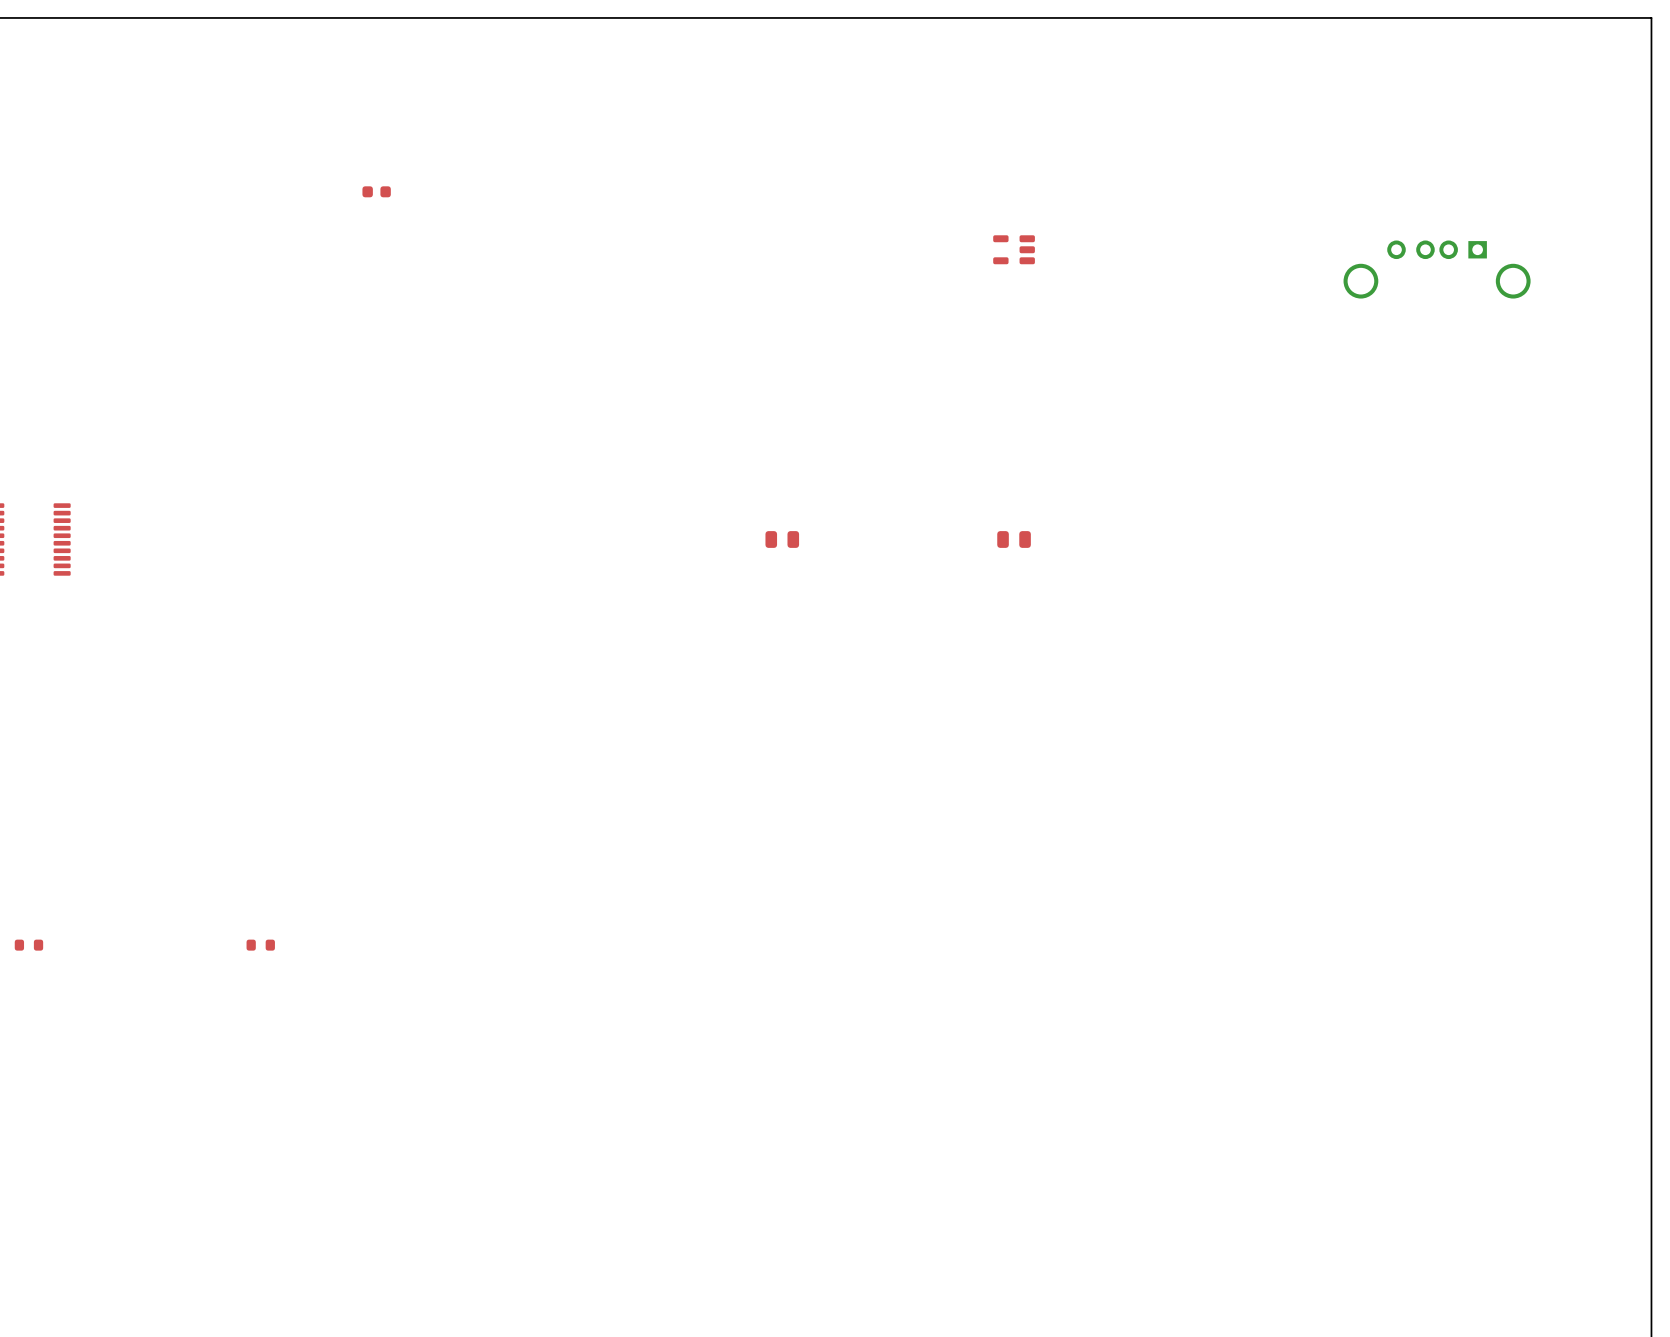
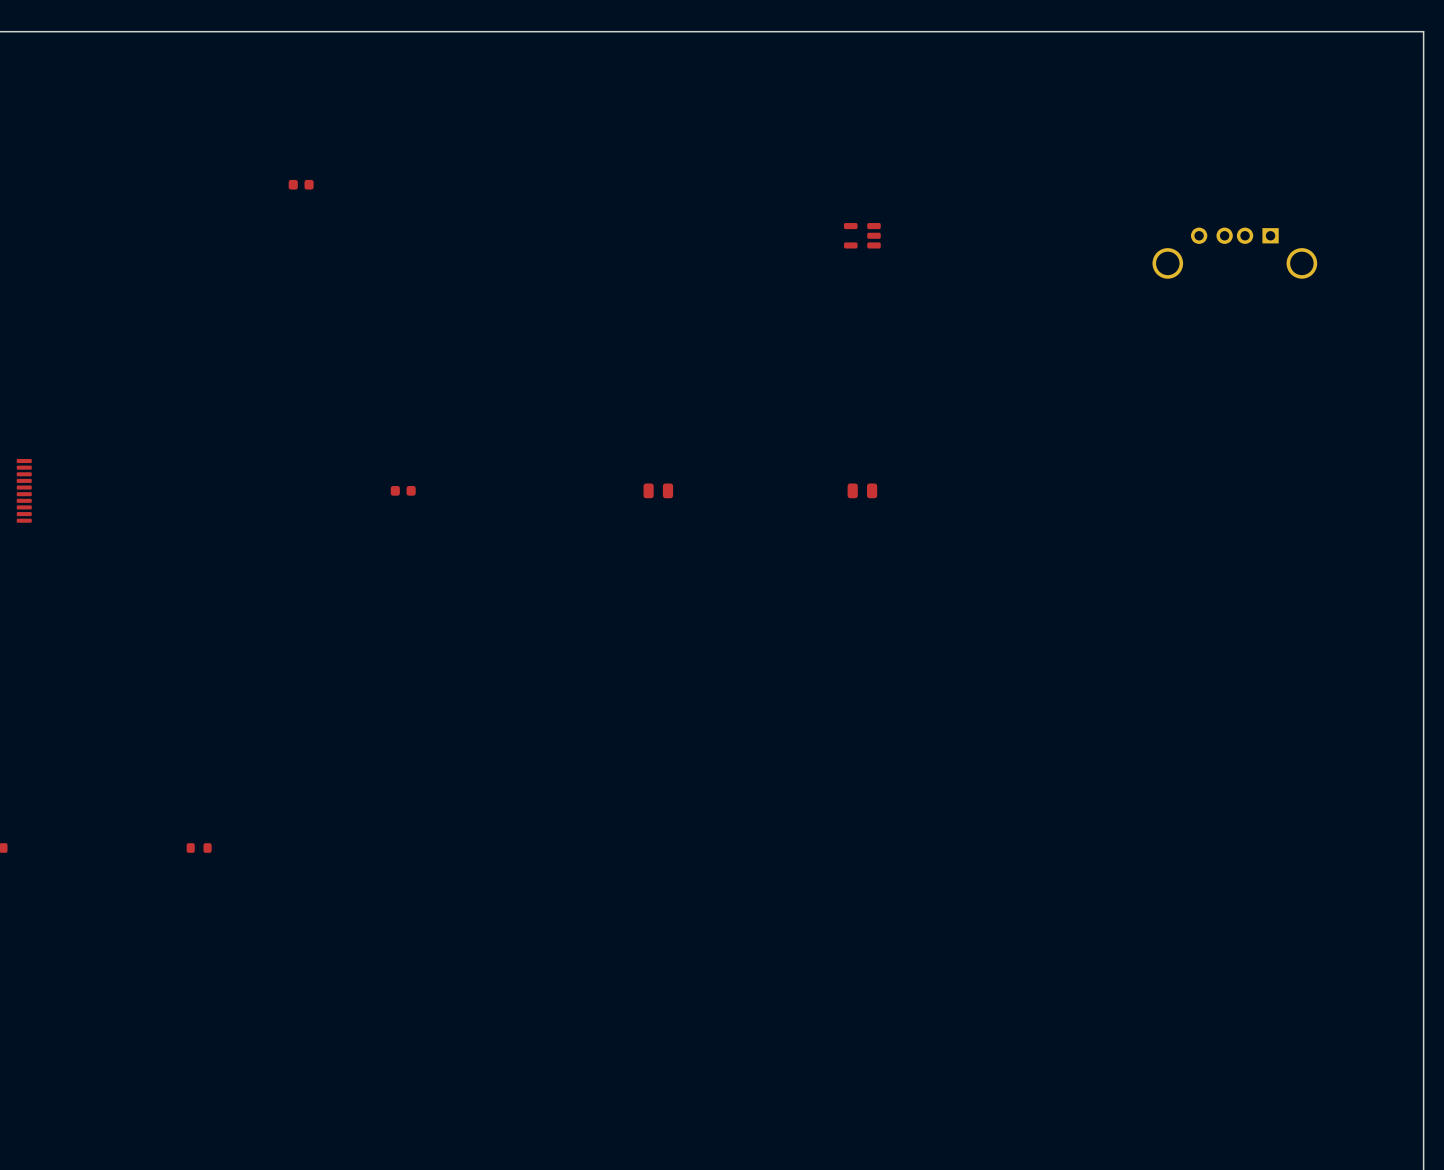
part: none -> (403, 490)

